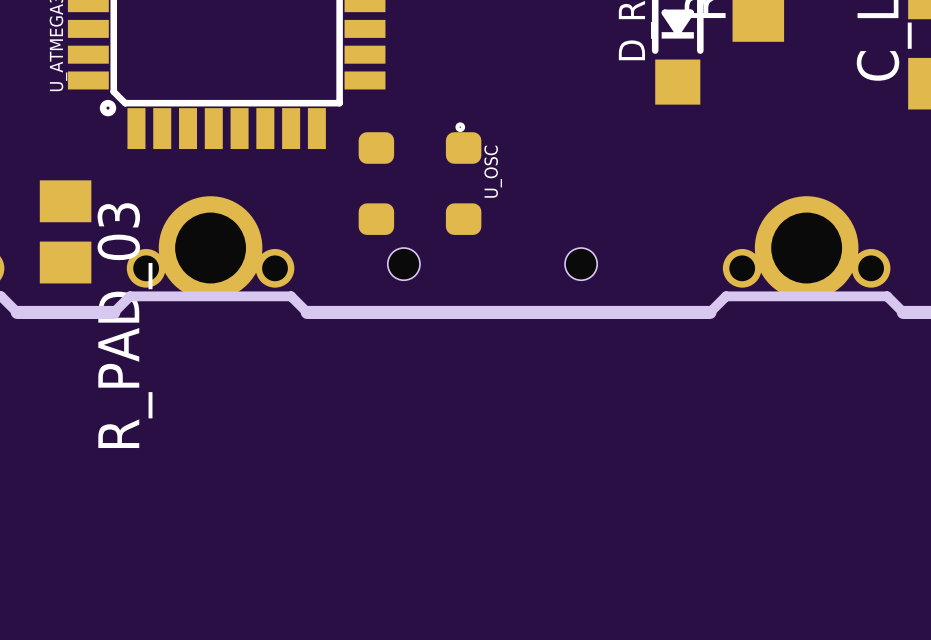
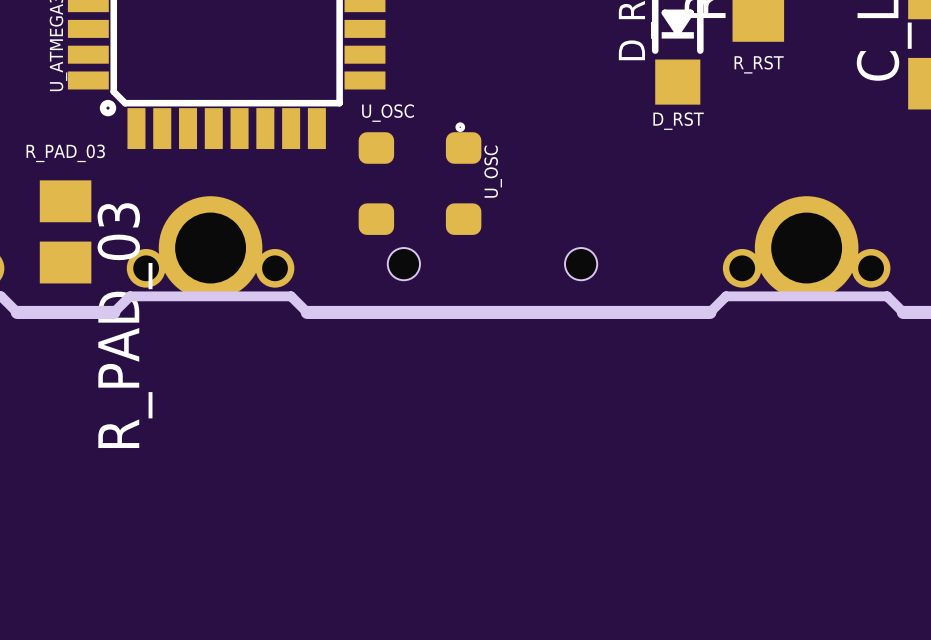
text: none -> R_RST (759, 64)
text: none -> U_OSC (388, 113)
text: none -> D_RST (678, 121)
text: none -> R_PAD_03 (65, 153)

